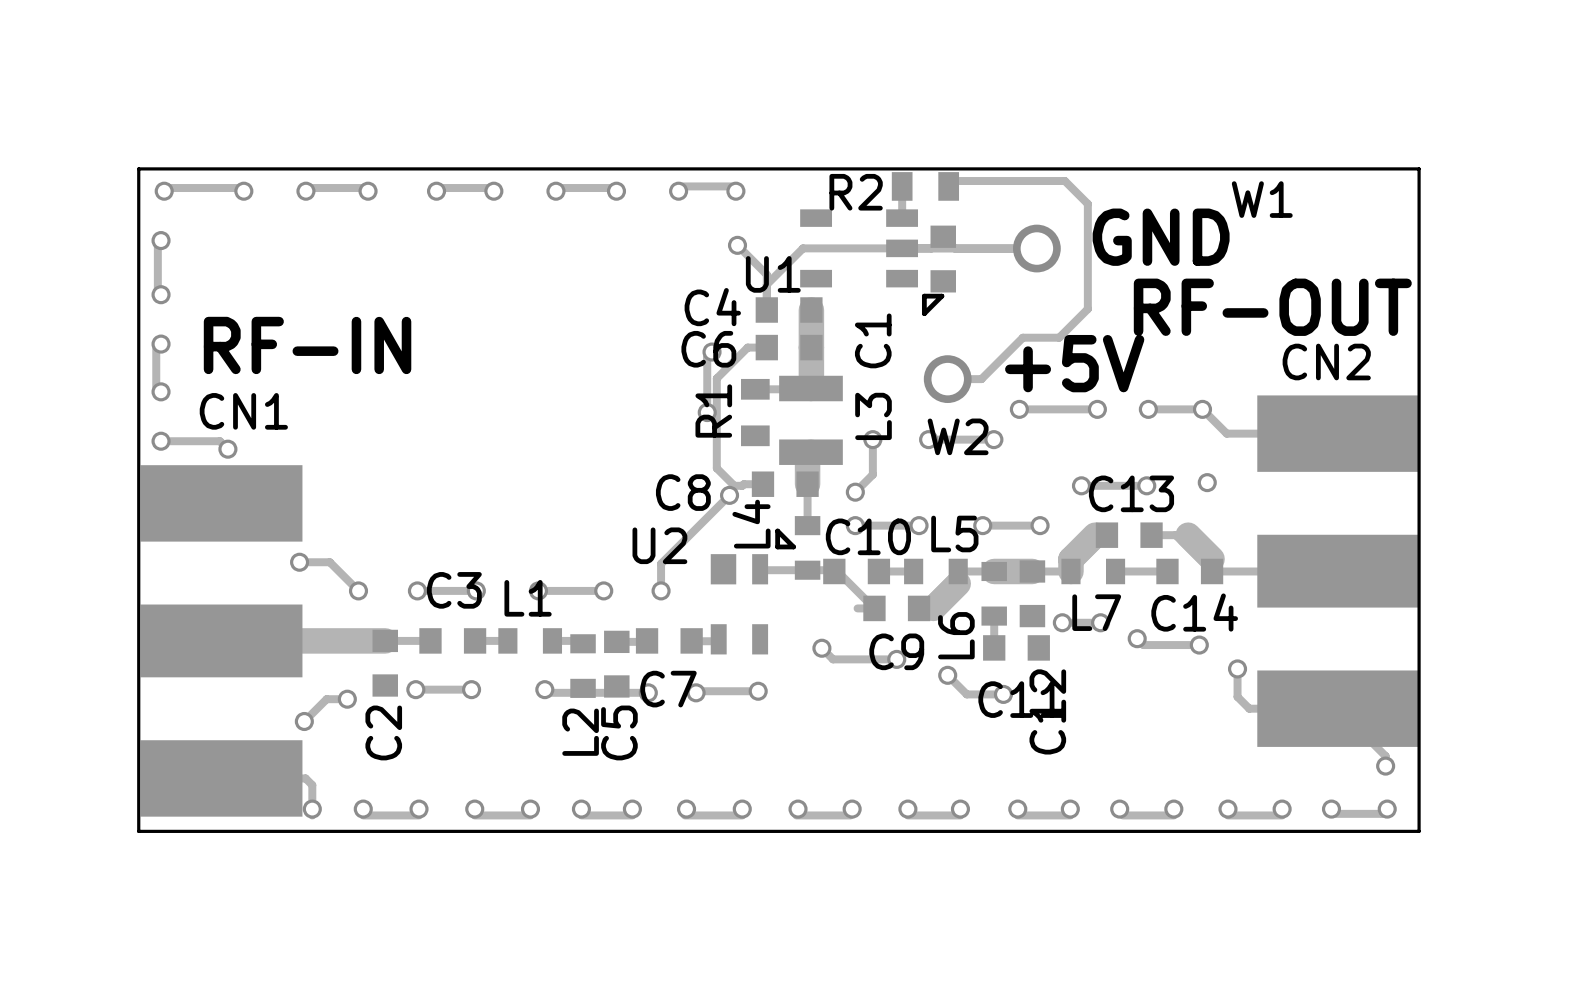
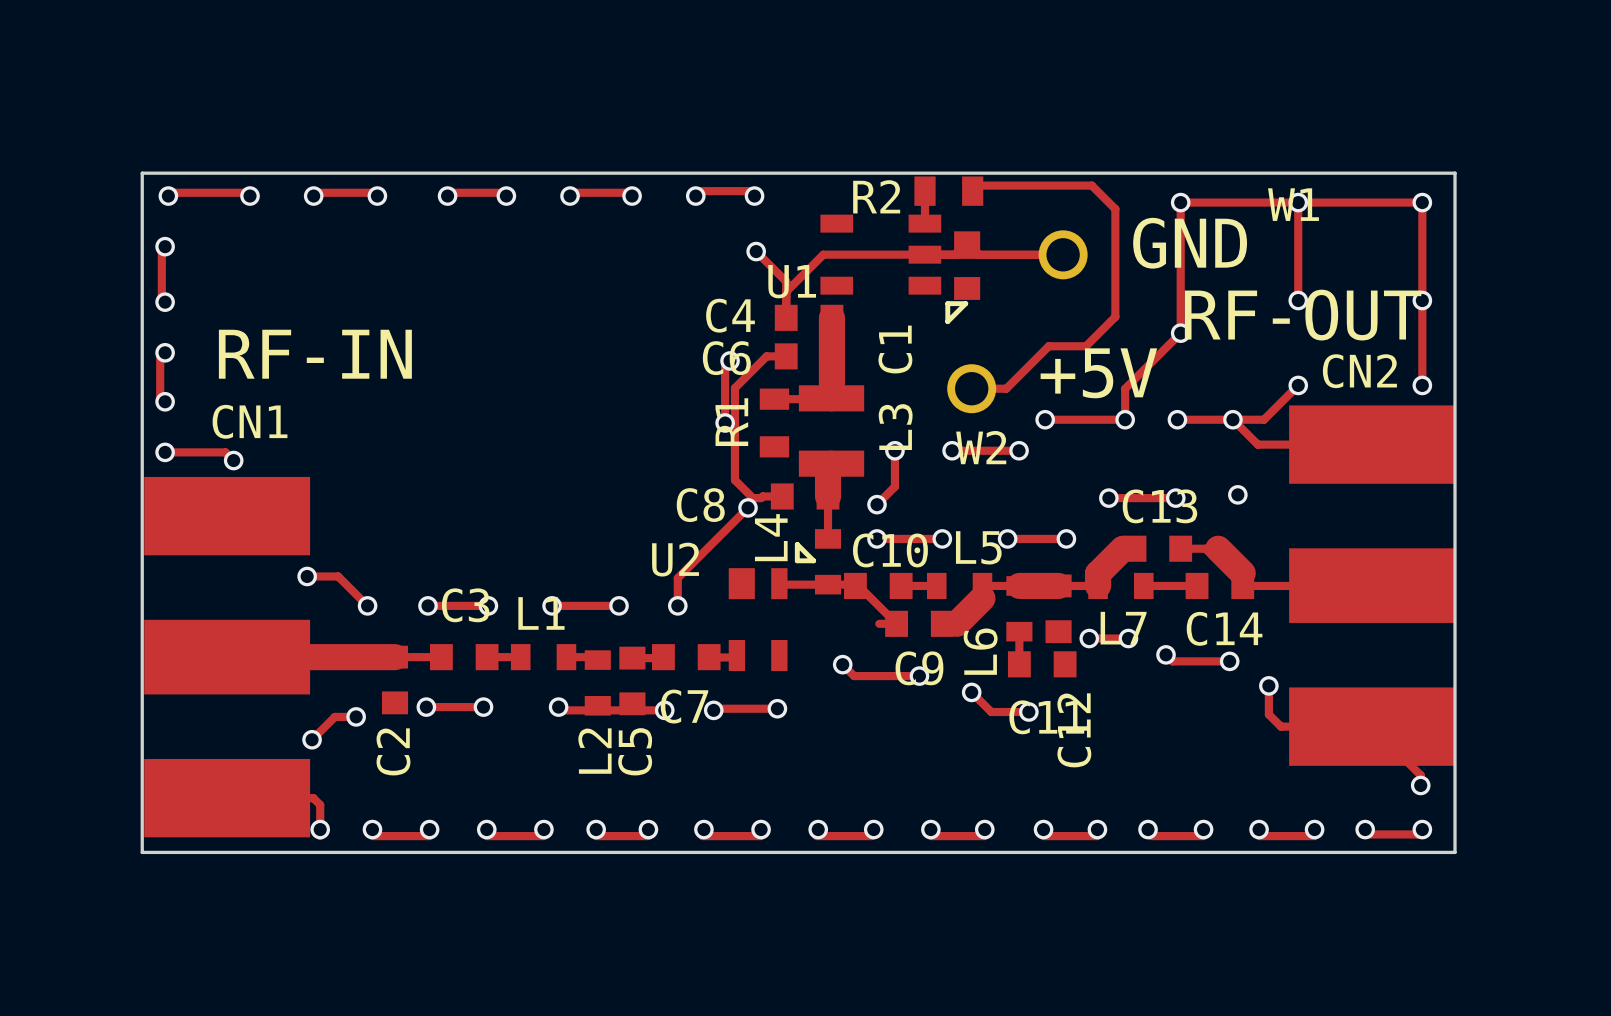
via: none -> (1180, 202)
track: none -> (1298, 202) (1298, 300)
via: none -> (1298, 202)
via: none -> (1422, 202)
via: none -> (1298, 300)
via: none -> (1422, 300)
via: none -> (1180, 333)
track: none -> (1298, 385) (1263, 419) (1232, 419)
via: none -> (1298, 385)
track: none -> (1422, 385) (1422, 202) (1180, 202) (1180, 333) (1125, 388) (1125, 419)
via: none -> (1422, 385)

